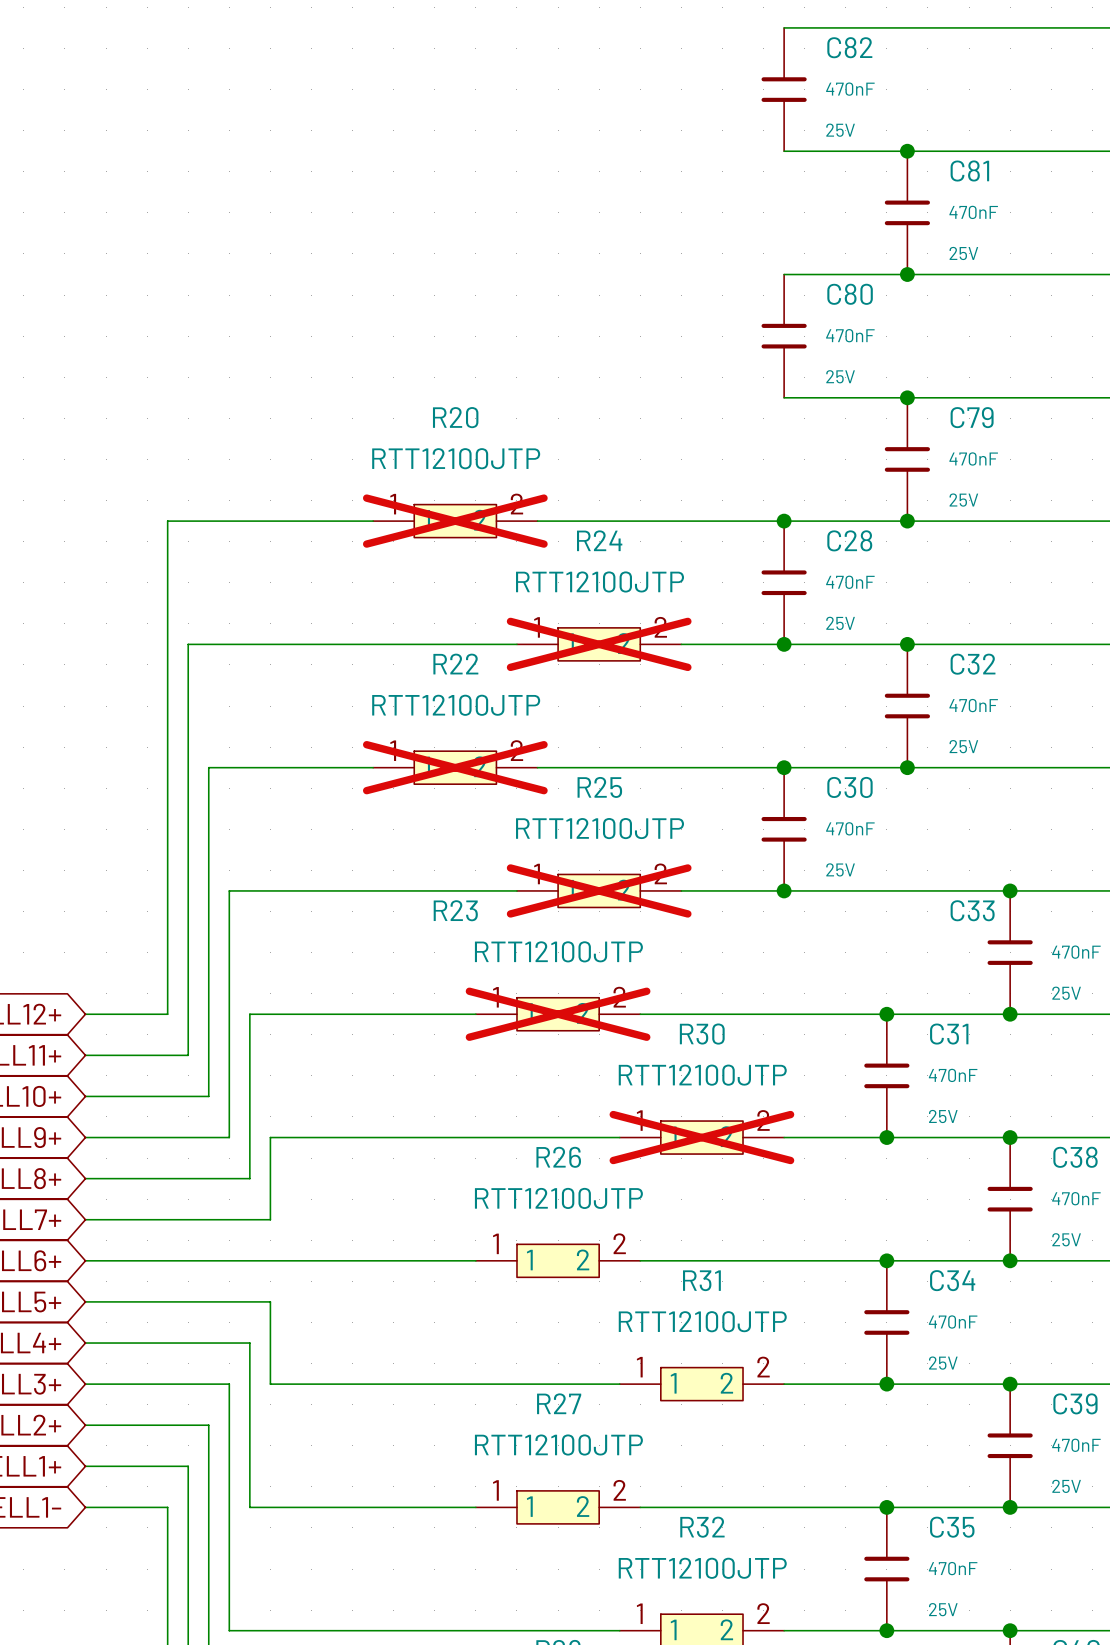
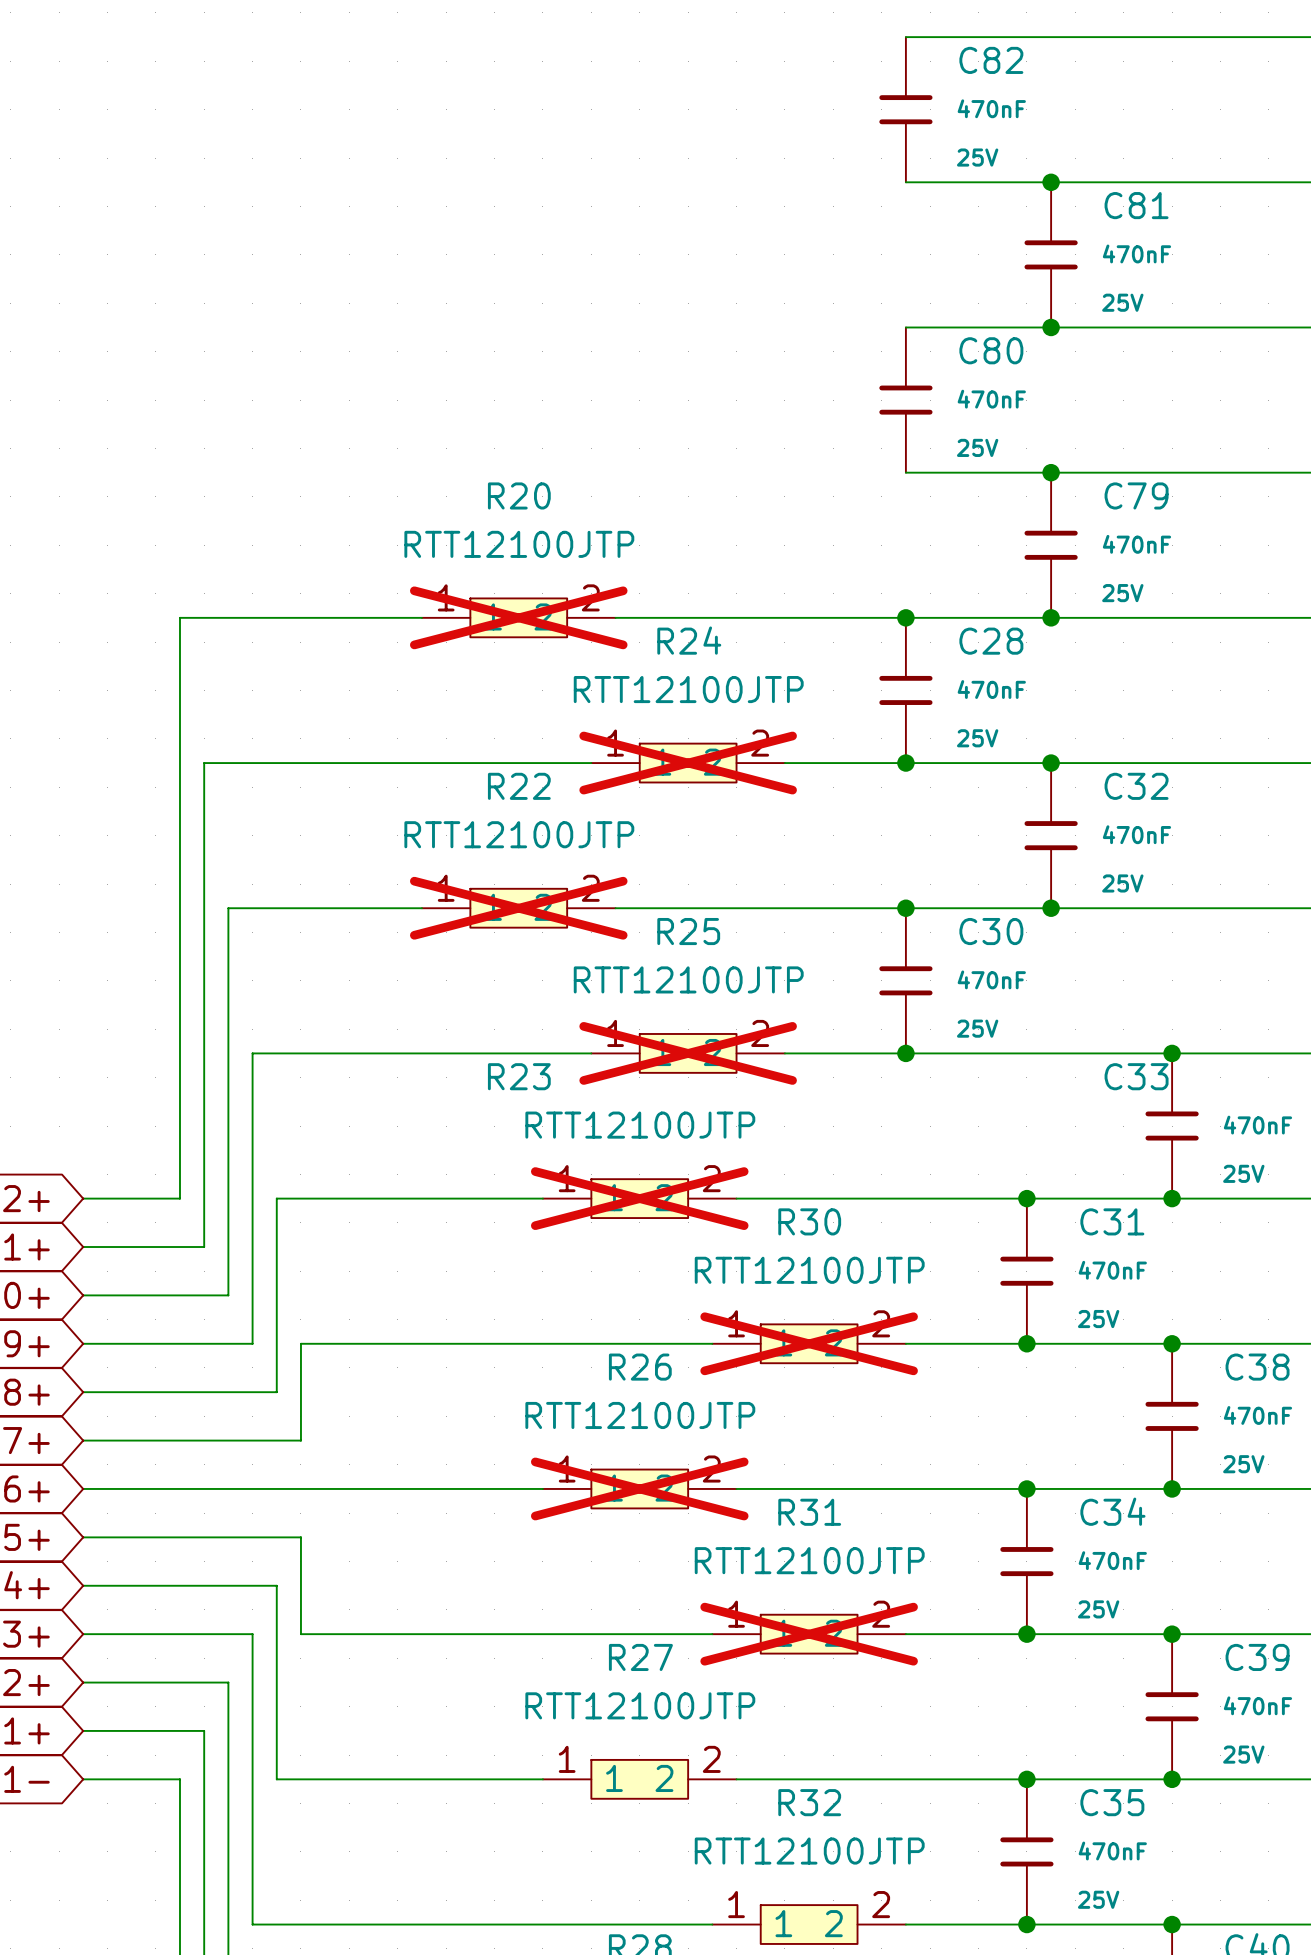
R26 do-not-place cross: none -> (639, 1488)
R31 do-not-place cross: none -> (809, 1634)

